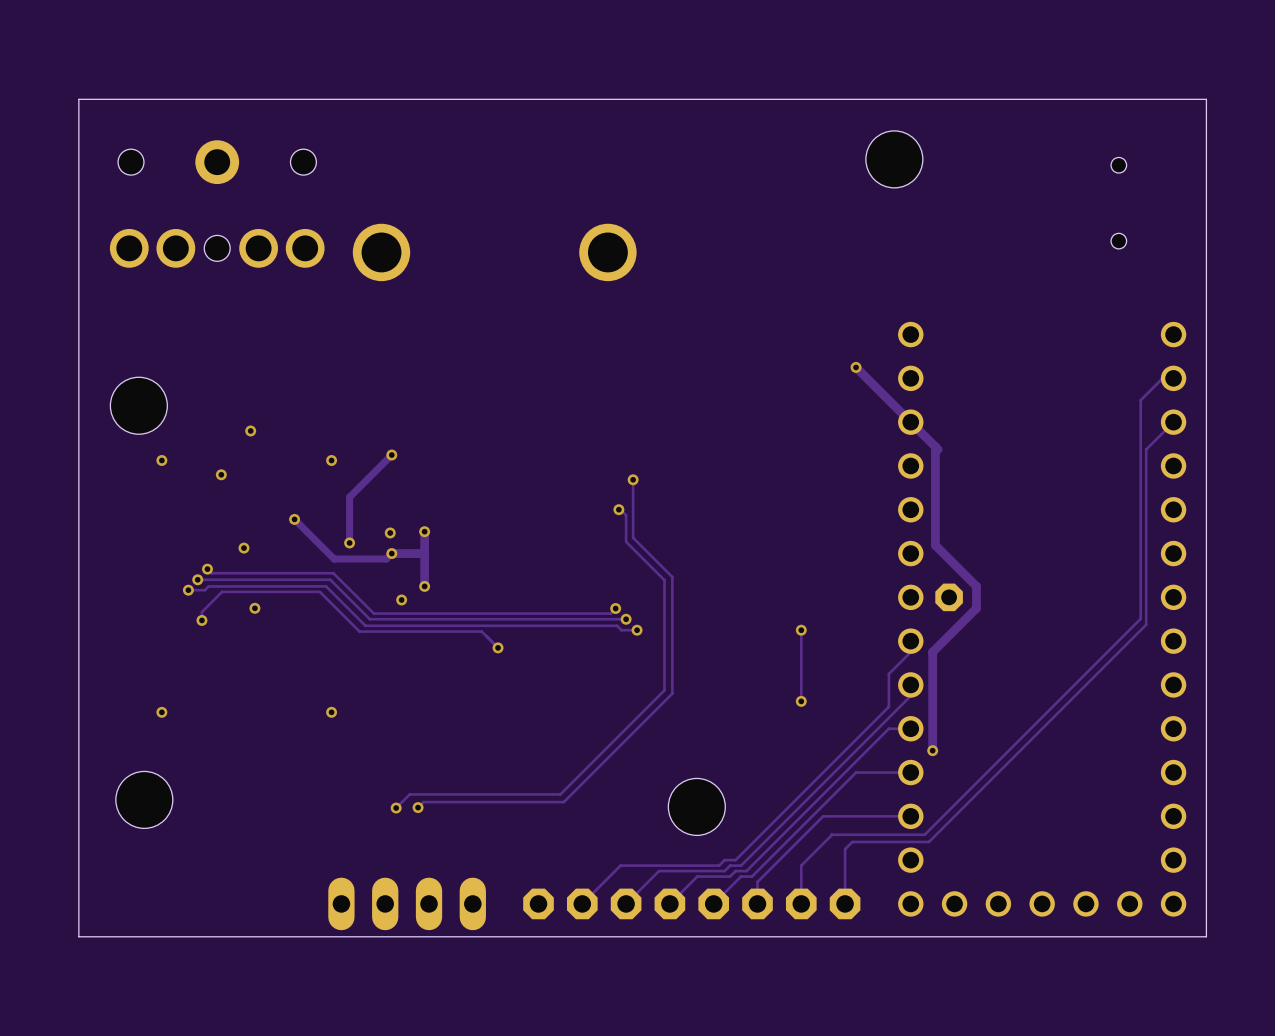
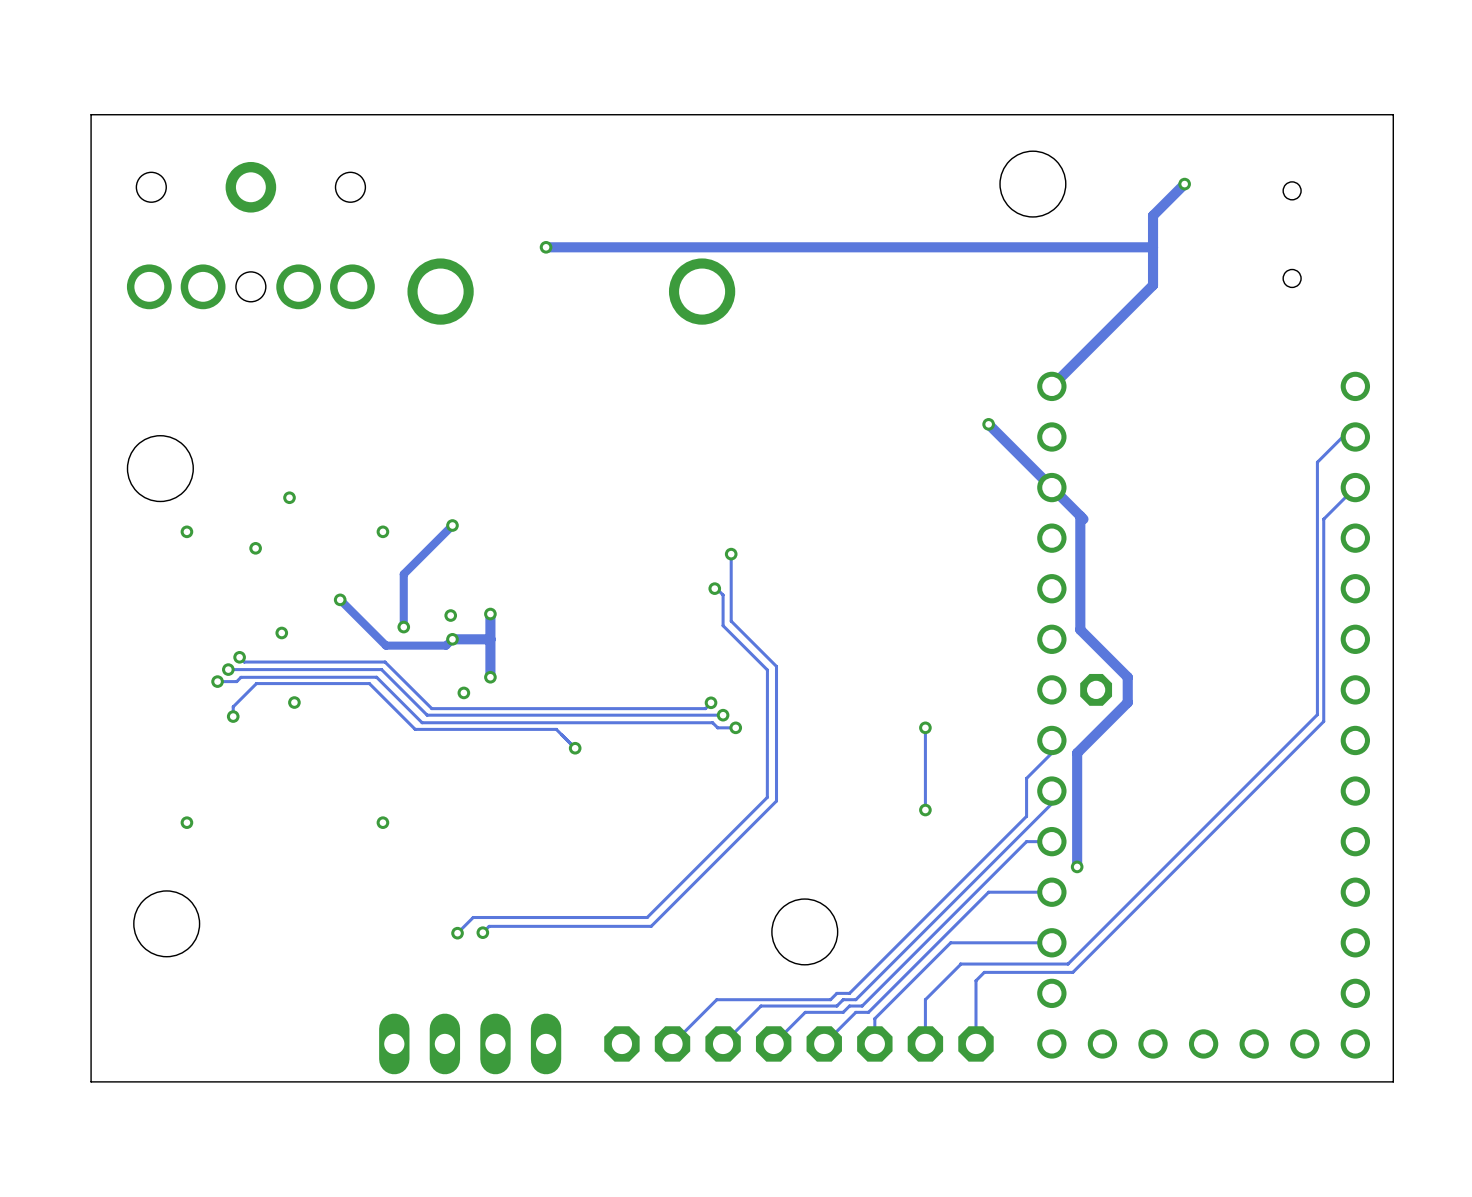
track: none -> (1184, 184) (1153, 215) (1153, 285) (1051, 386)
via: none -> (1184, 184)
via: none -> (546, 247)
track: none -> (1153, 247) (546, 247)

